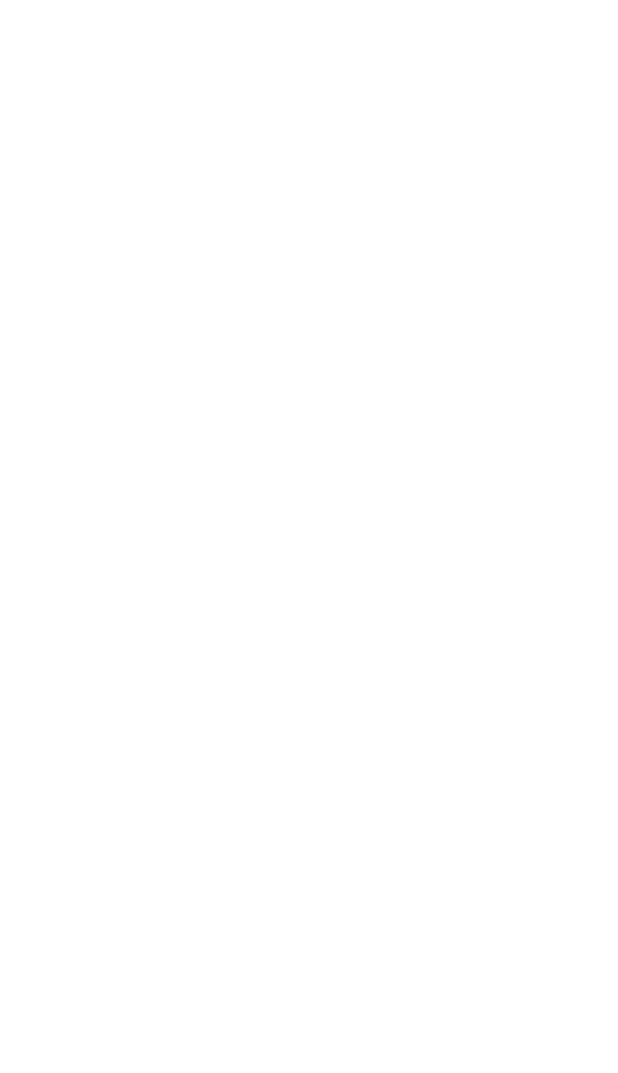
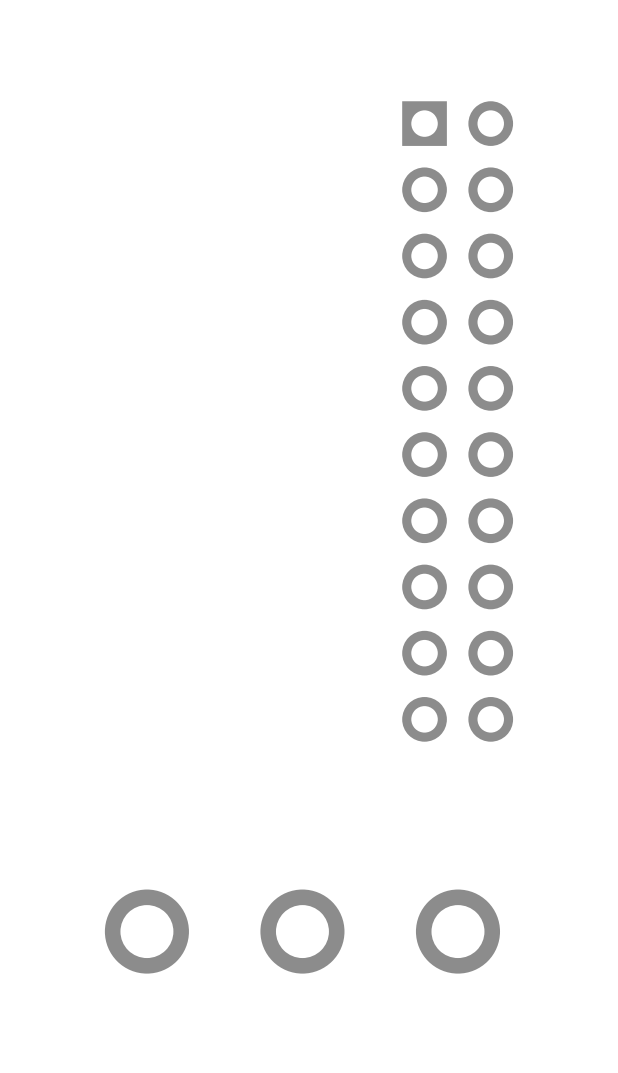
part: none -> (457, 421)
part: none -> (302, 931)

